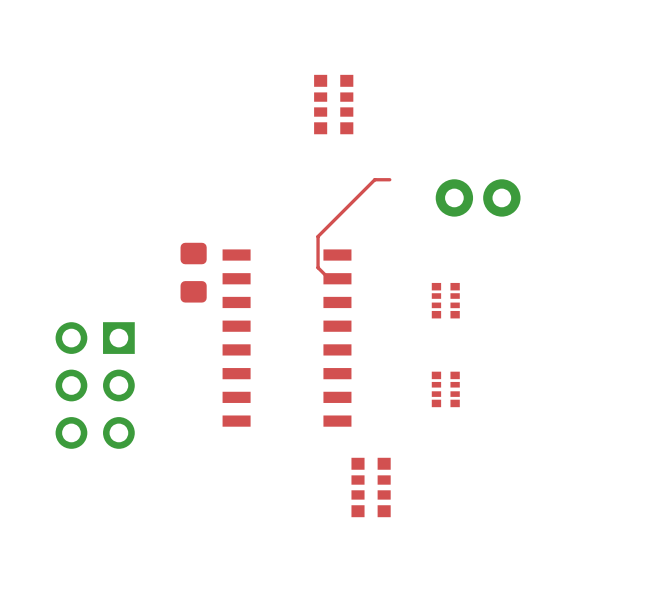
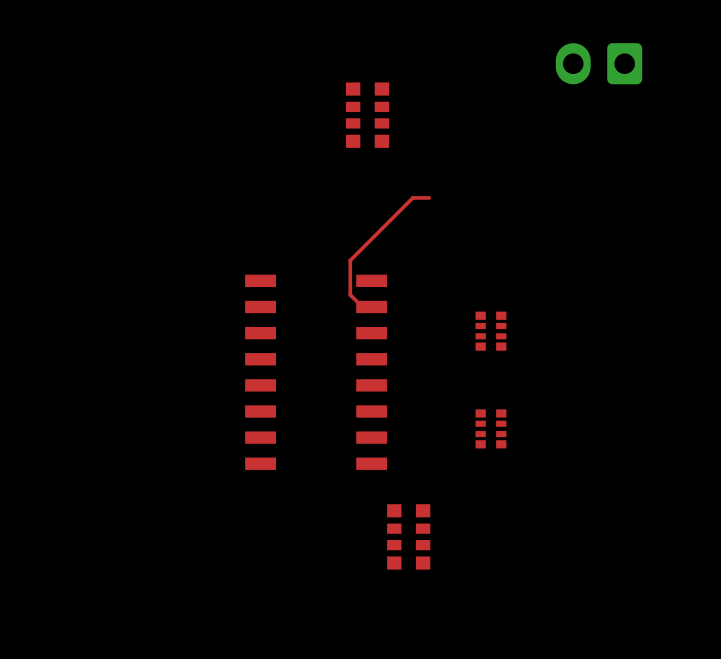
part: none -> (598, 63)
part: (478, 197) -> none
part: (193, 272) -> none
part: (95, 385) -> none

